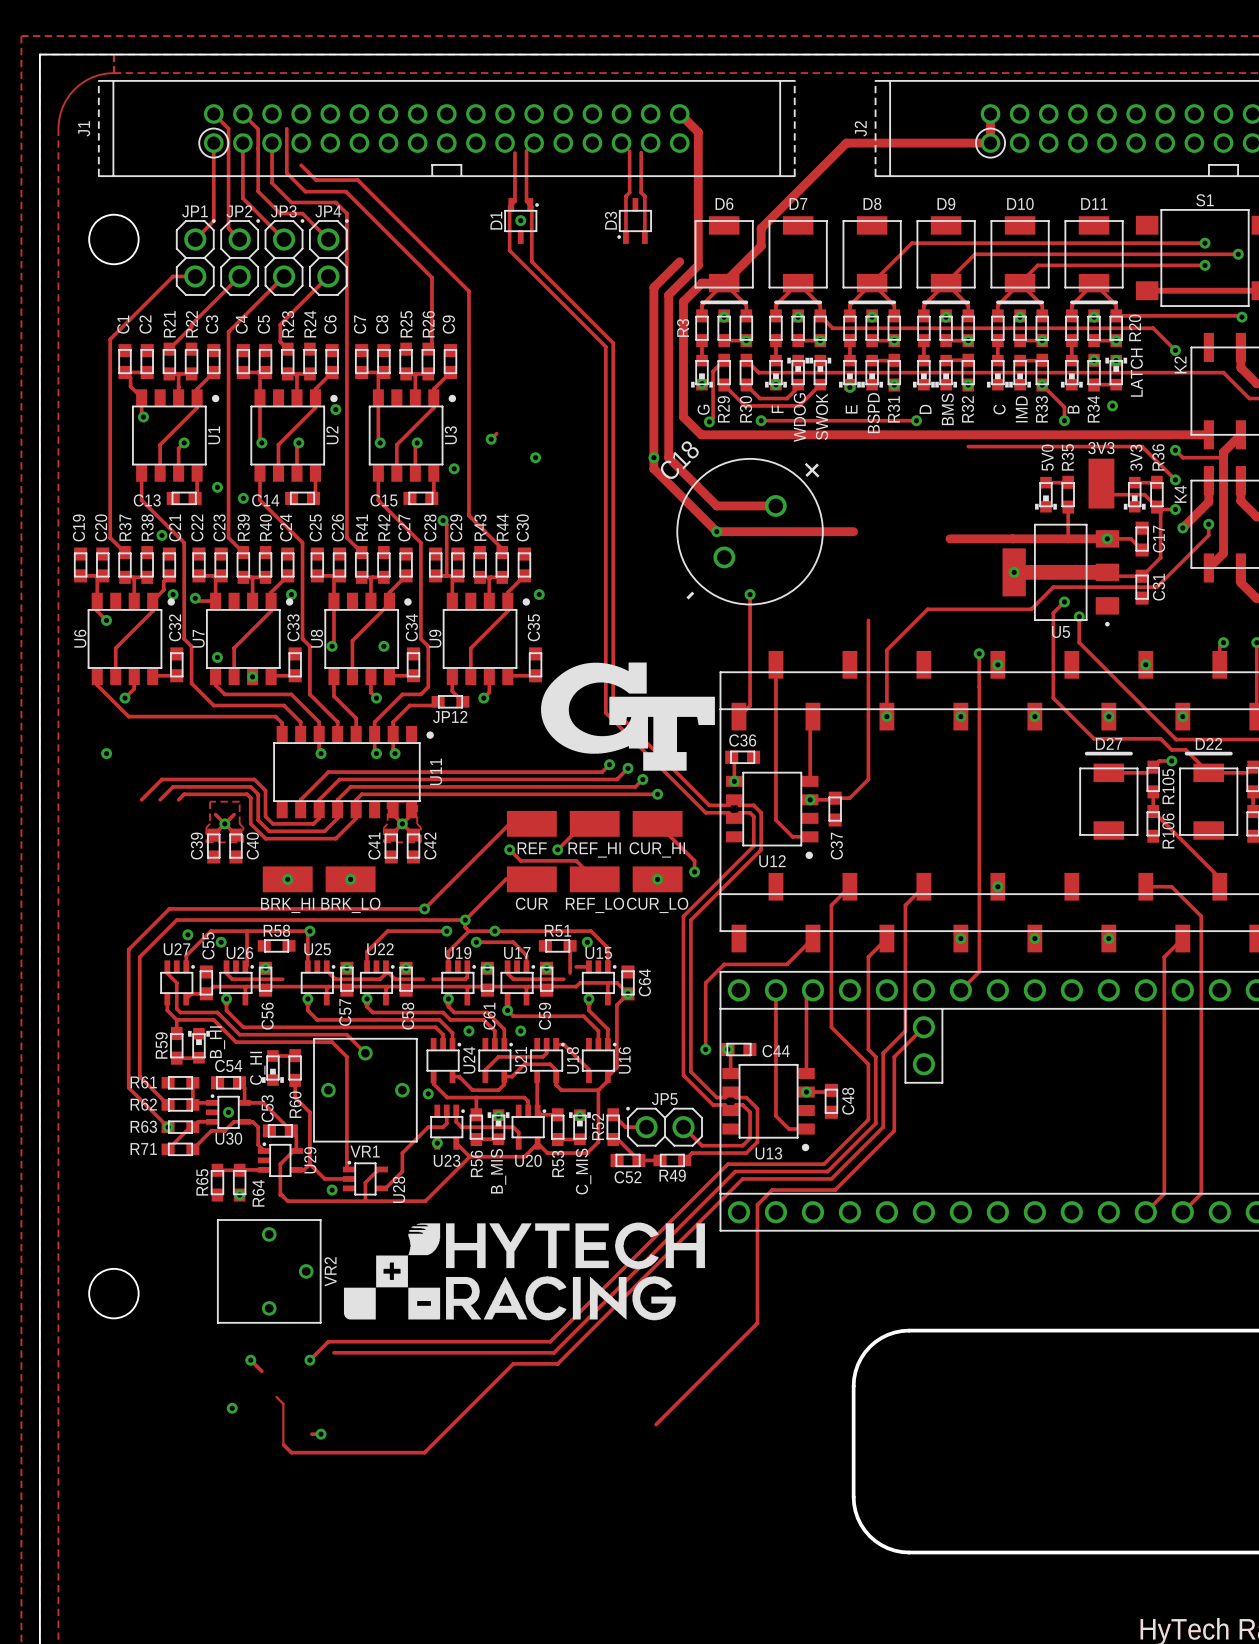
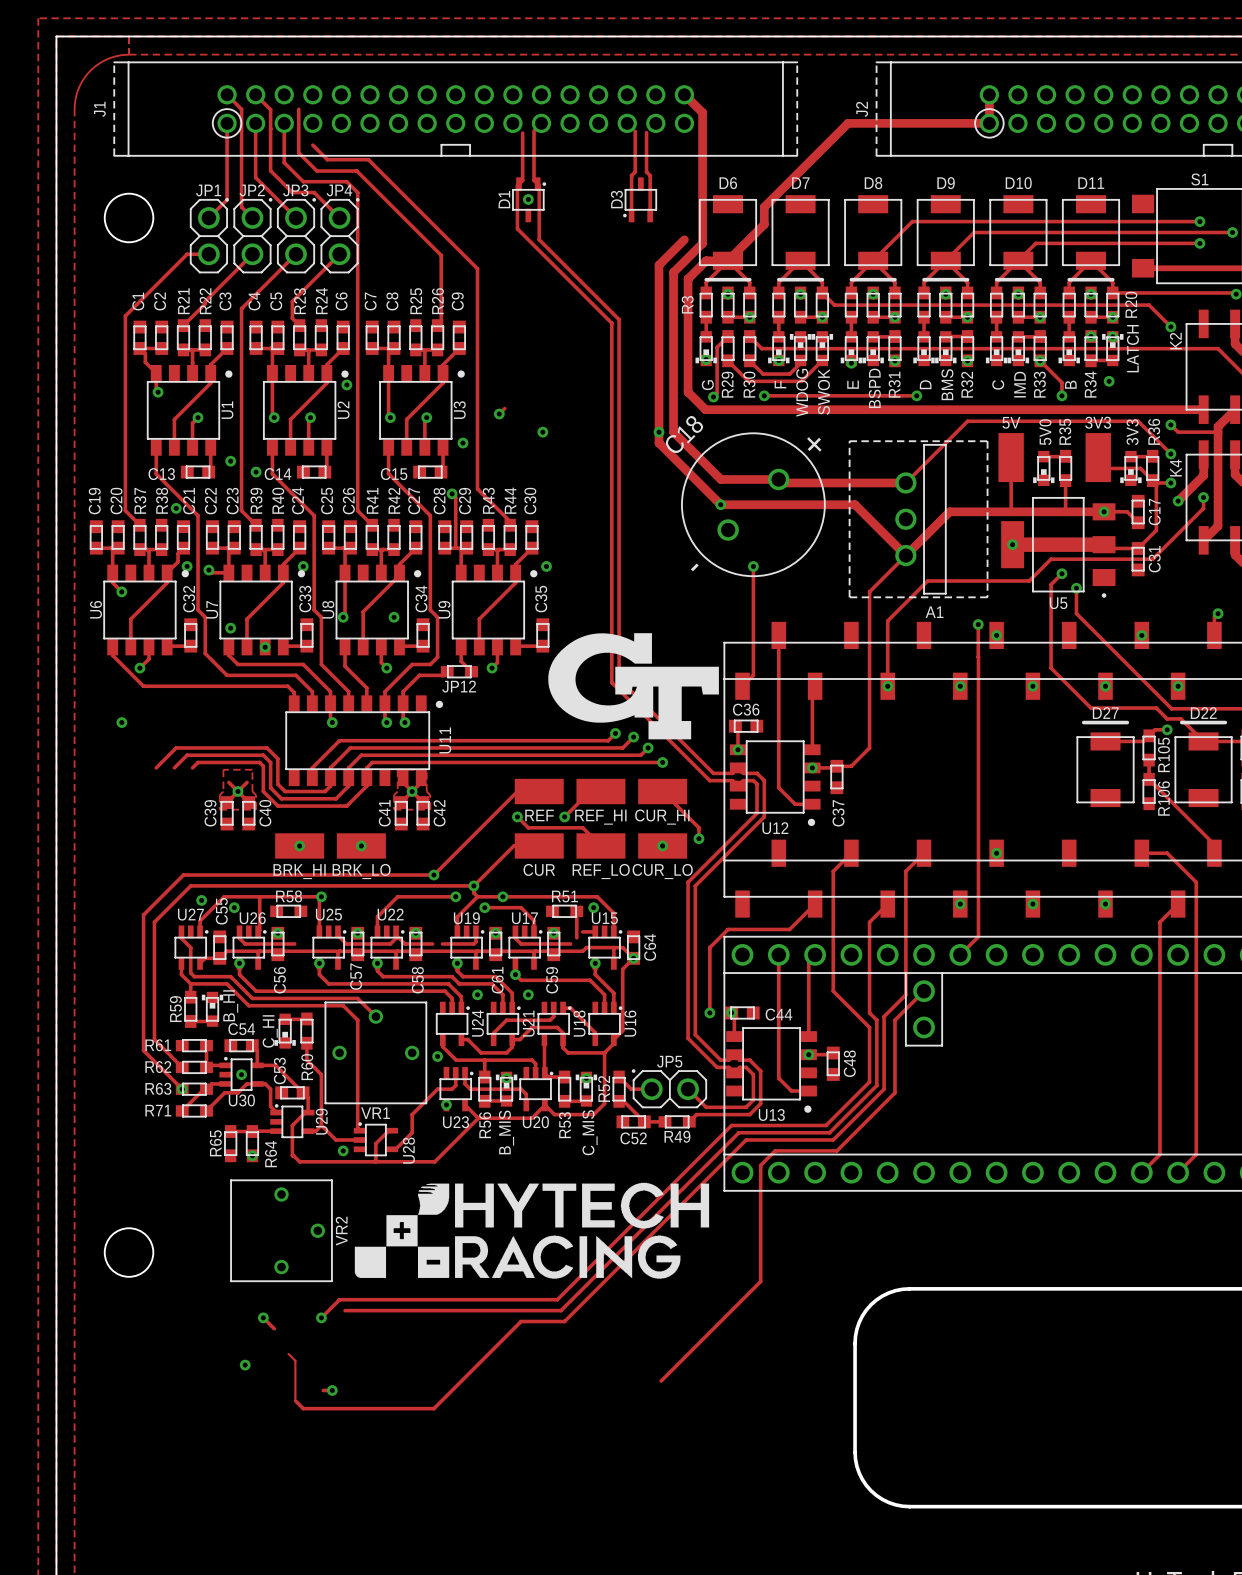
track: none -> (967, 421) (905, 482) (782, 482)
track: none -> (1011, 457) (1011, 511)
part: none -> (1011, 457)
track: none -> (855, 504) (905, 555)
track: none -> (949, 511) (905, 555)
A1: none -> (918, 519)
track: none -> (905, 555) (869, 591)

